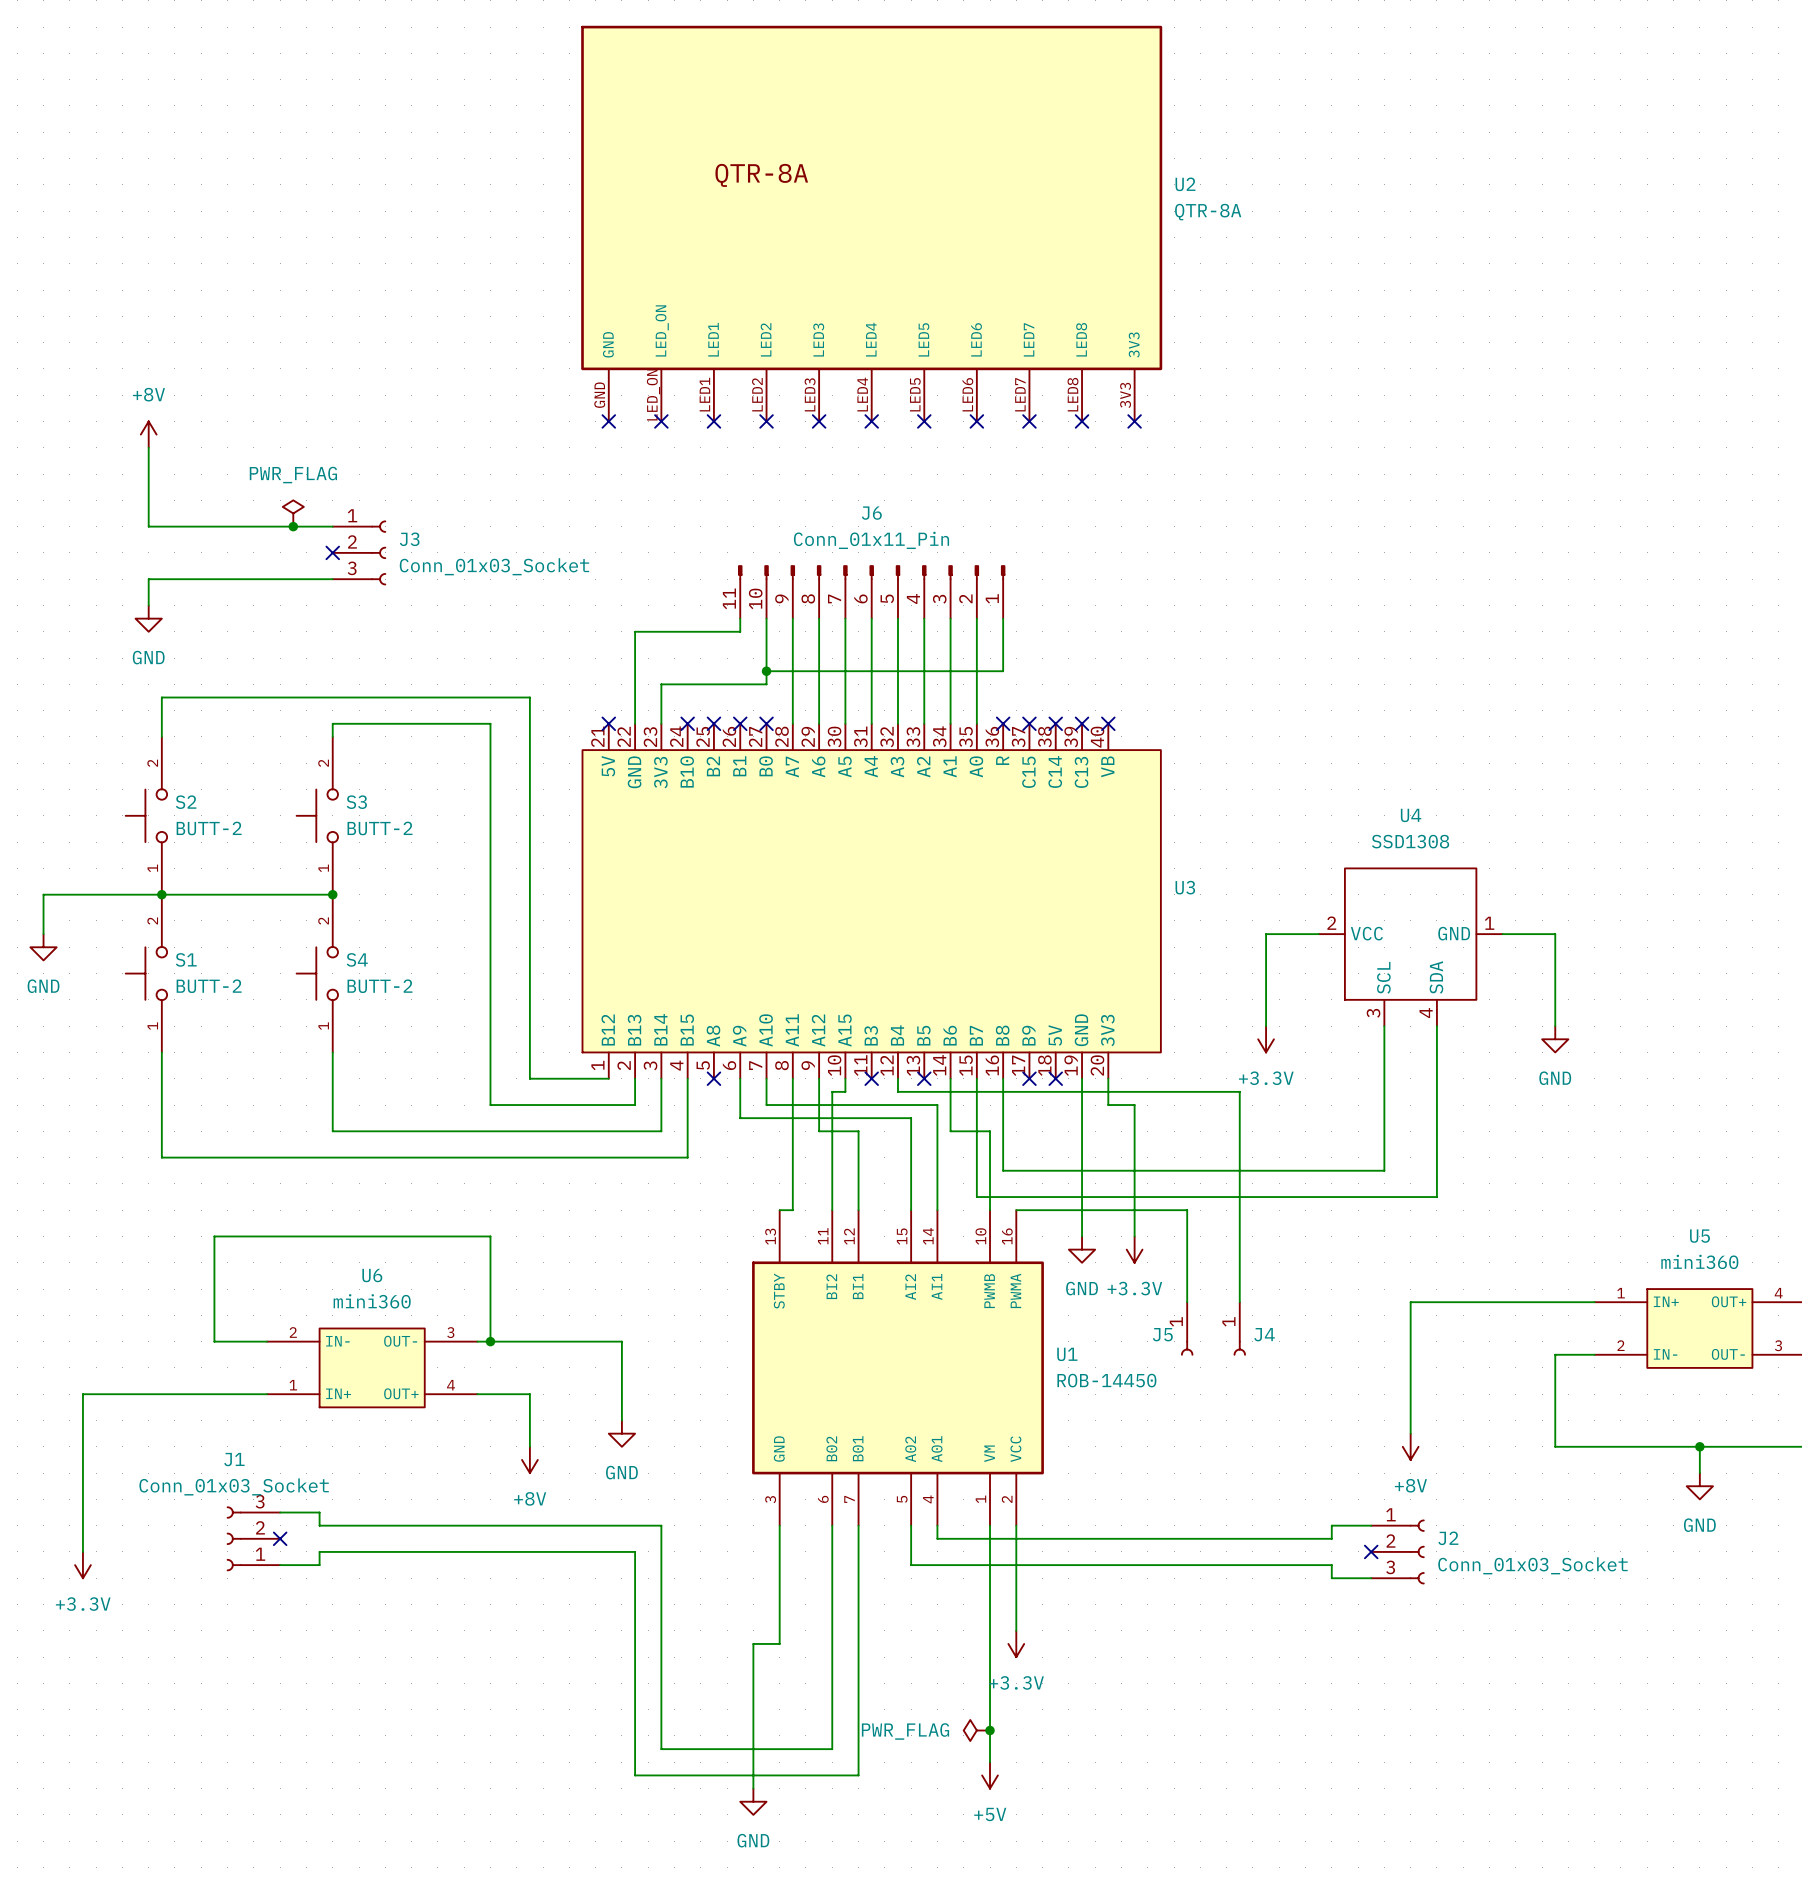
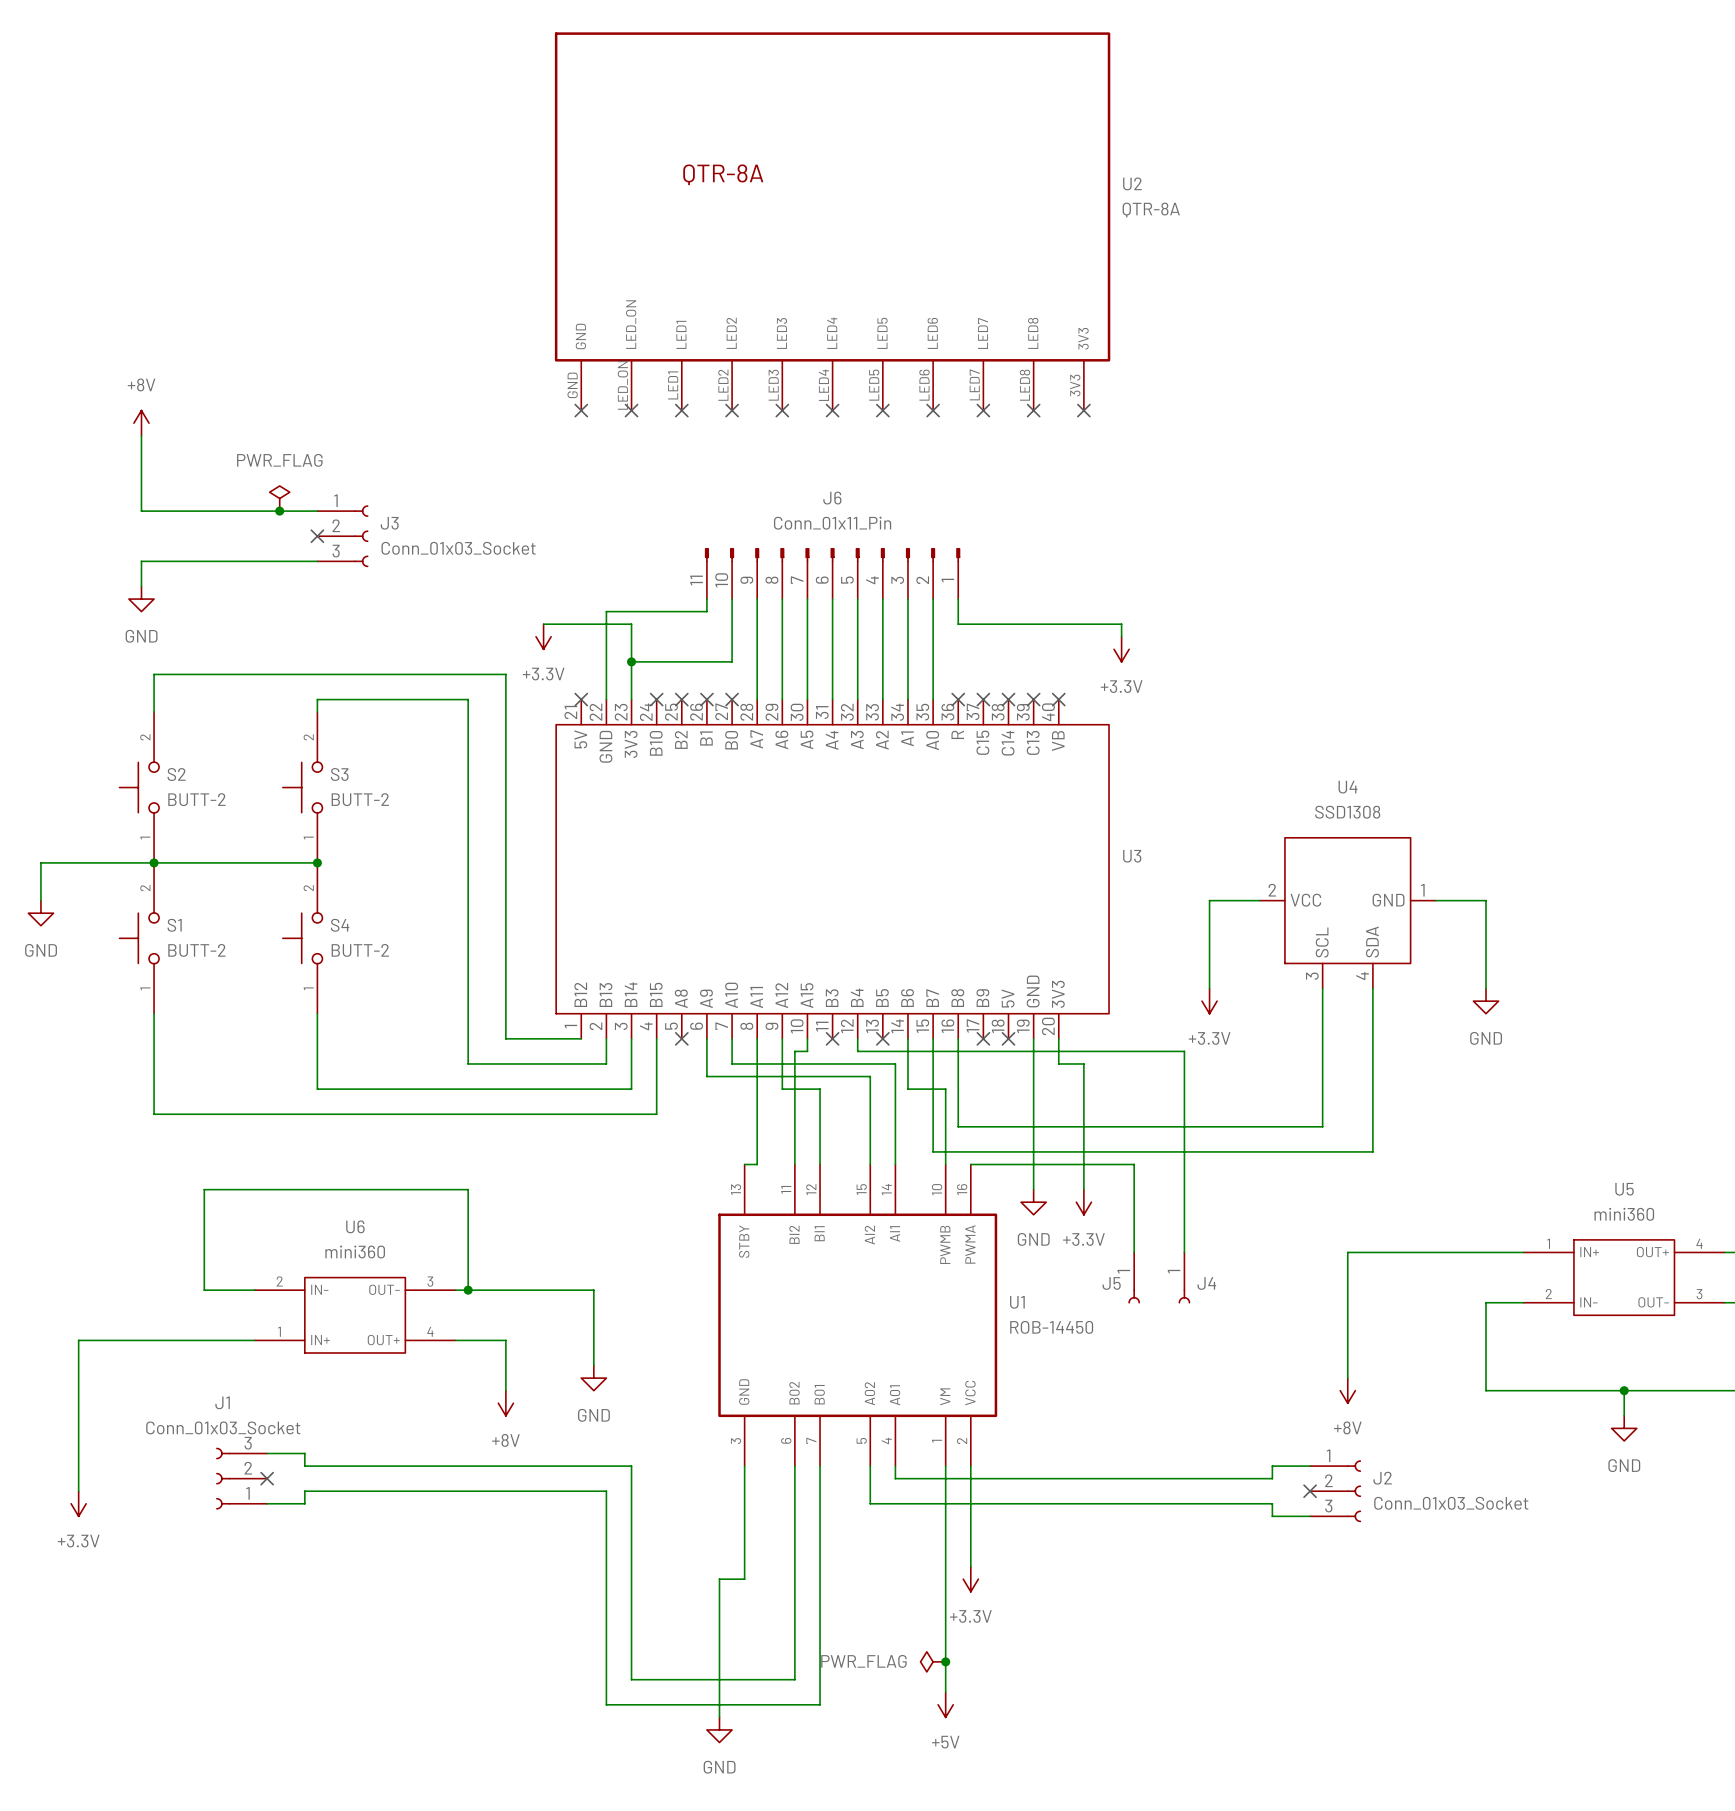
wire: none -> (543, 624) (631, 624) (631, 661)
wire: (1003, 644) (1003, 671) (766, 671) -> (958, 624) (1121, 624) (1121, 636)
power symbol: none -> +3.3V (543, 636)
junction: (766, 671) -> none
power symbol: none -> +3.3V (1121, 649)
junction: none -> (631, 661)

